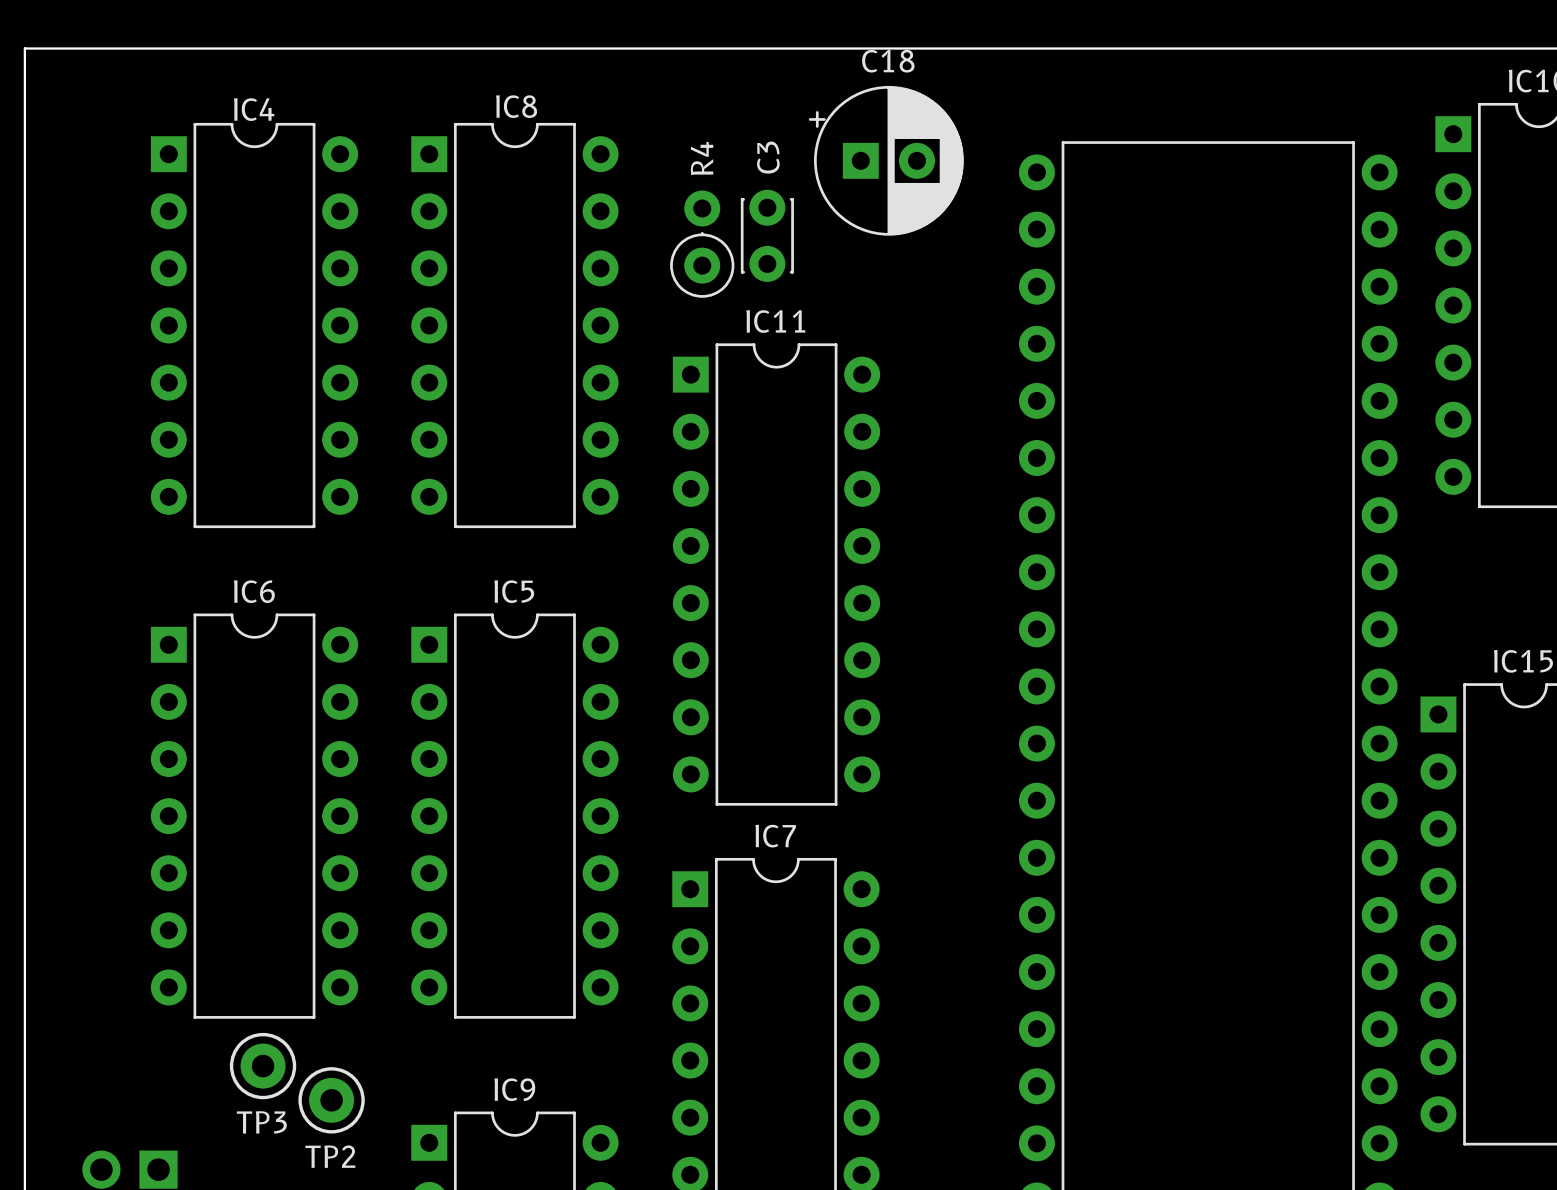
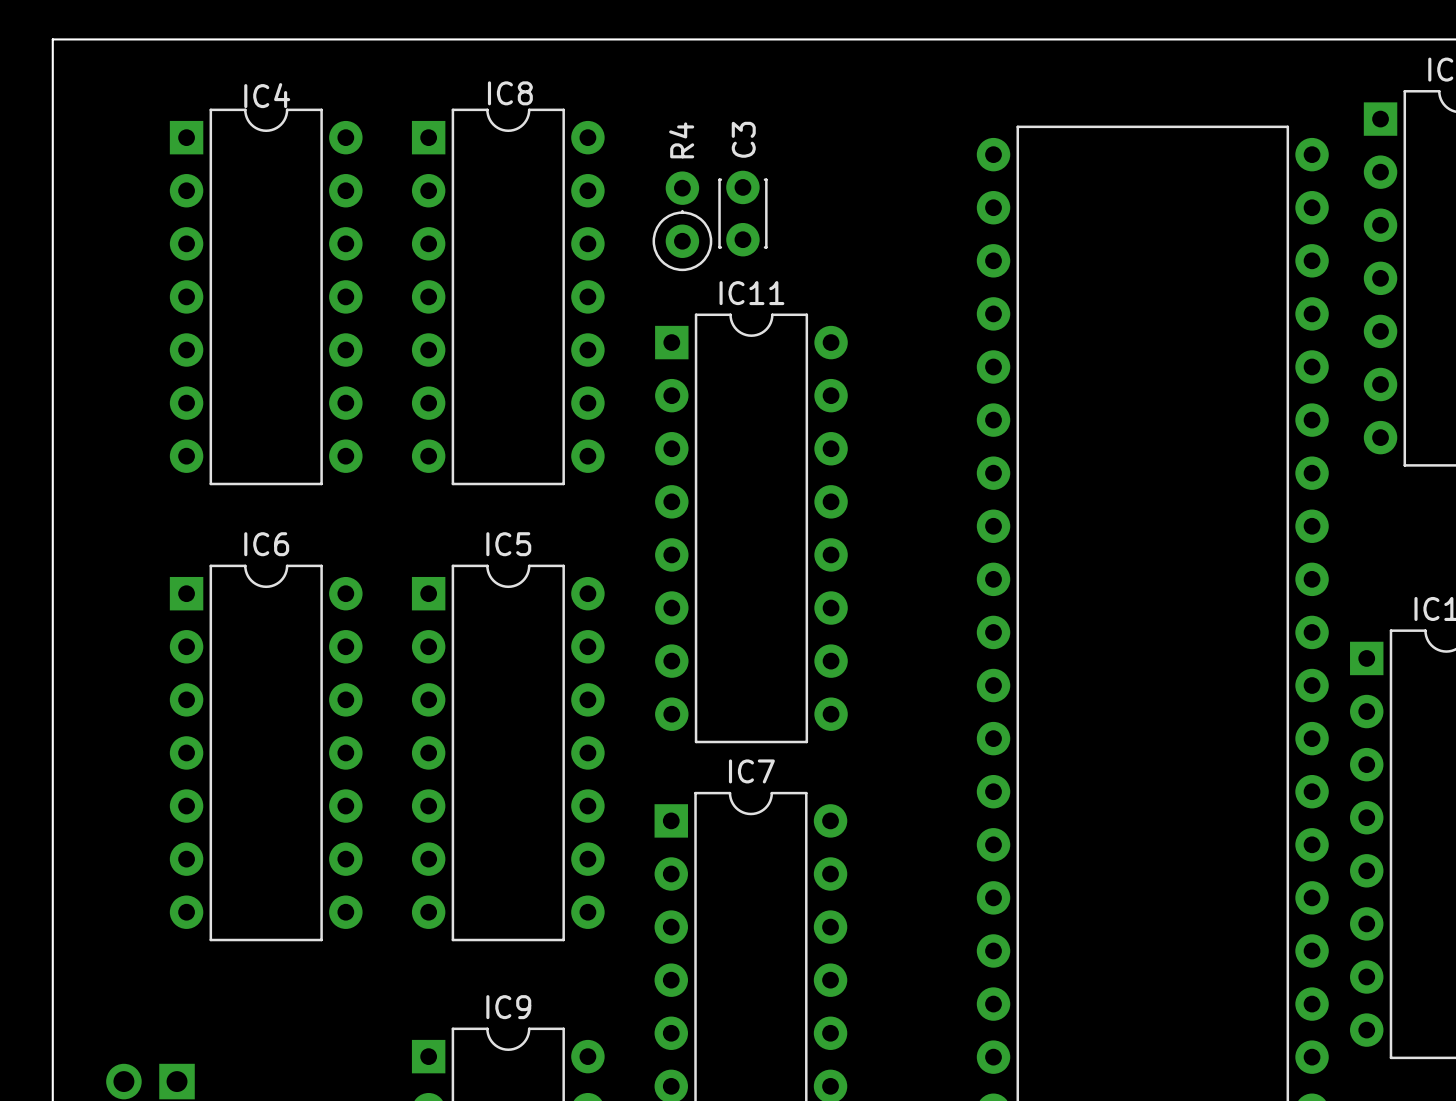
C18: (886, 160) -> none
TP3: (263, 1066) -> none
TP2: (331, 1100) -> none

